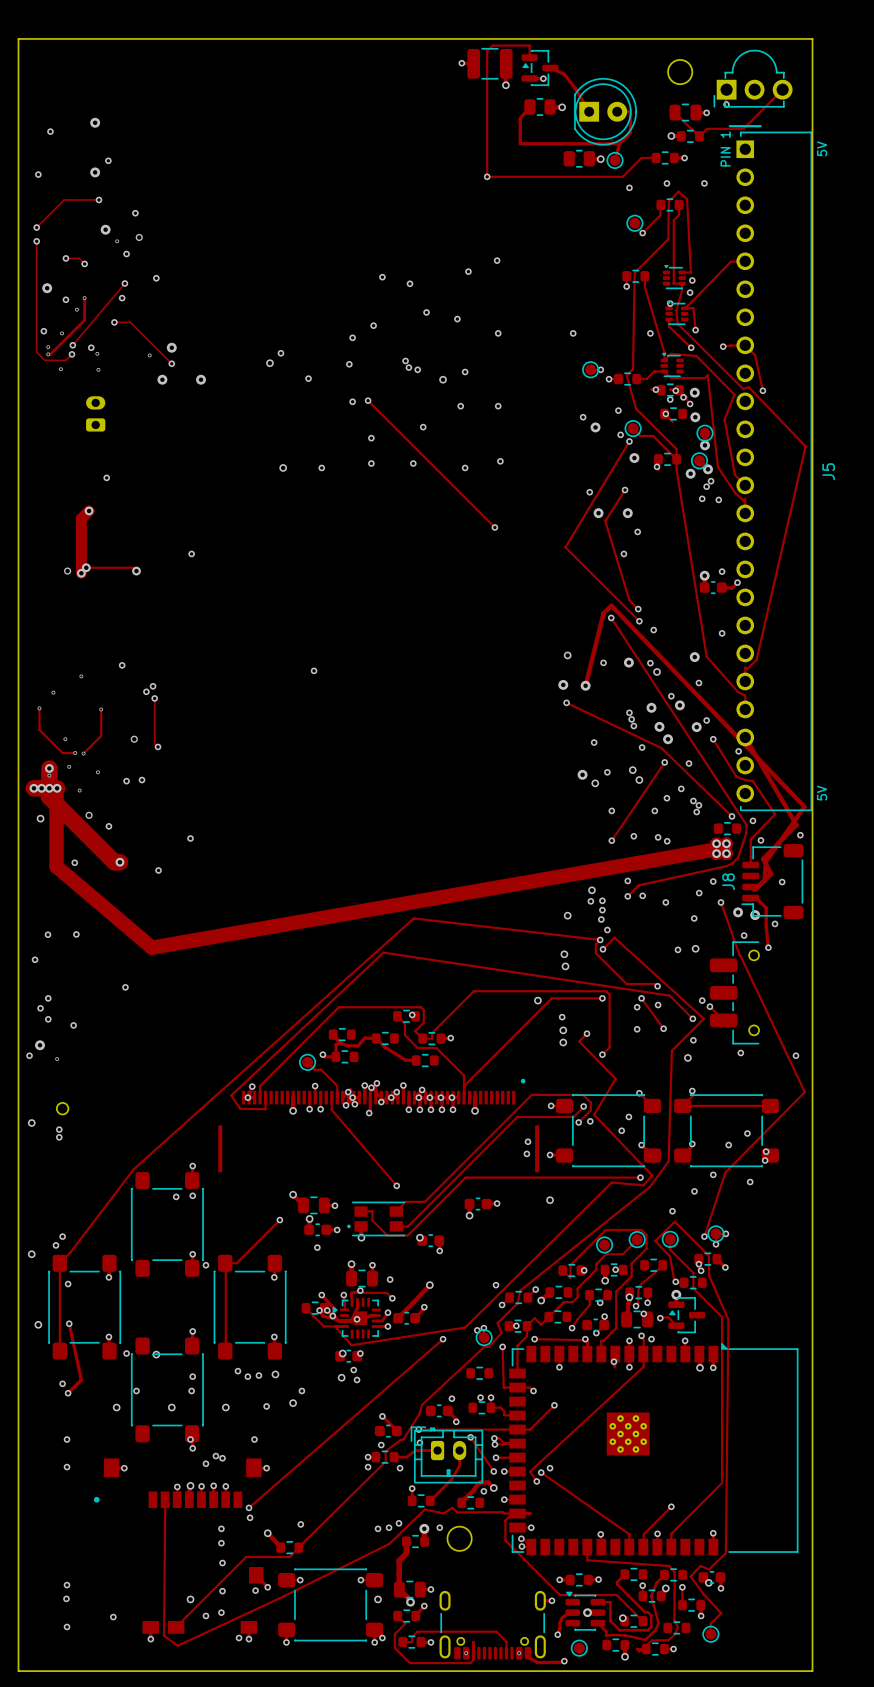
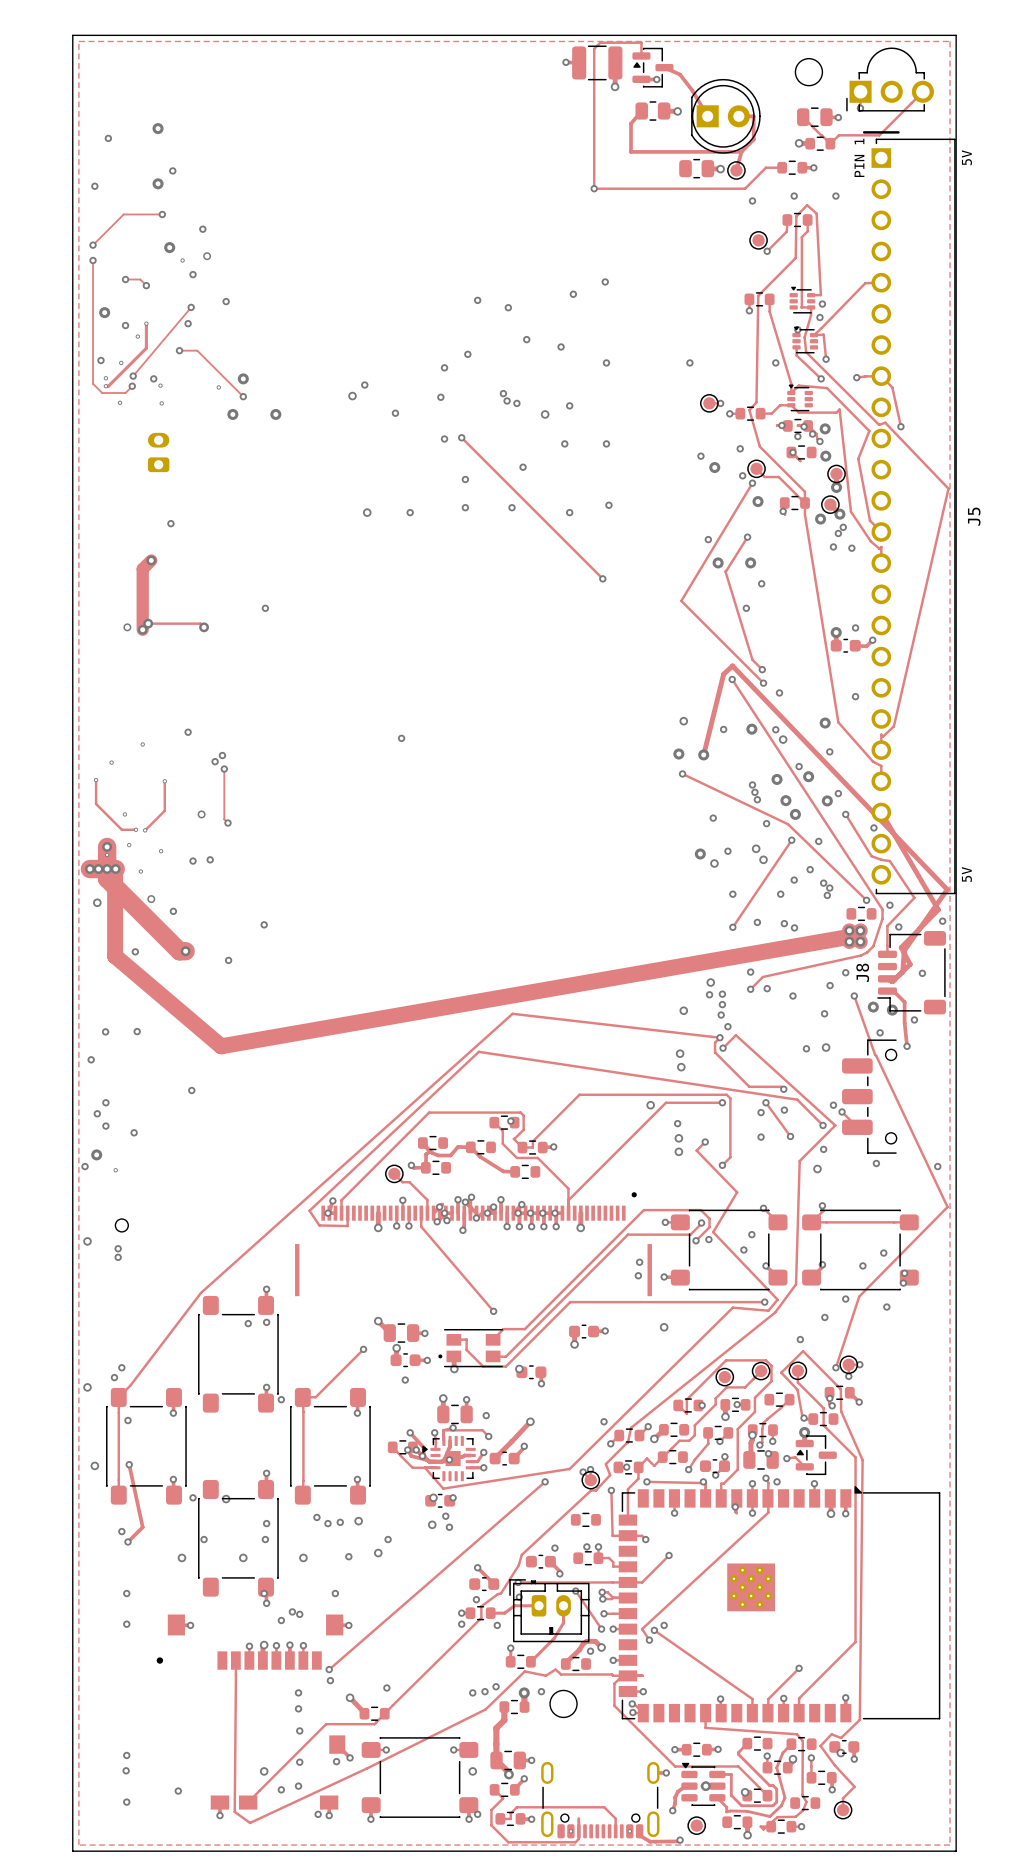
zone outline: none -> (78, 41) (950, 41) (950, 1845) (78, 1845) (78, 41)

